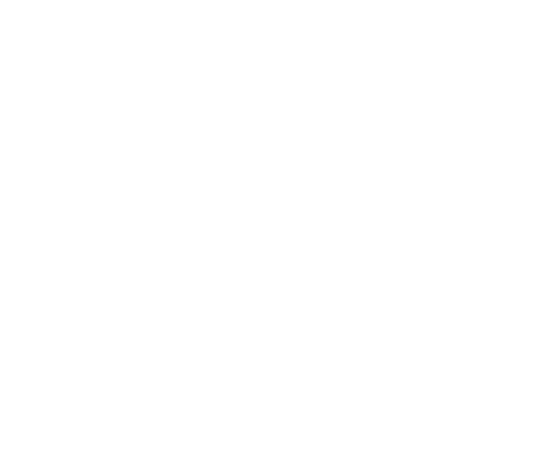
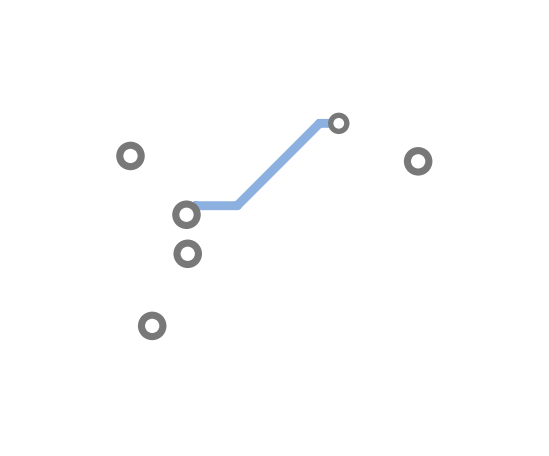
track: none -> (338, 123) (319, 123) (237, 205) (195, 205) (186, 214)
via: none -> (338, 123)
via: none -> (130, 155)
via: none -> (418, 161)
via: none -> (186, 214)
via: none -> (187, 253)
via: none -> (152, 325)

